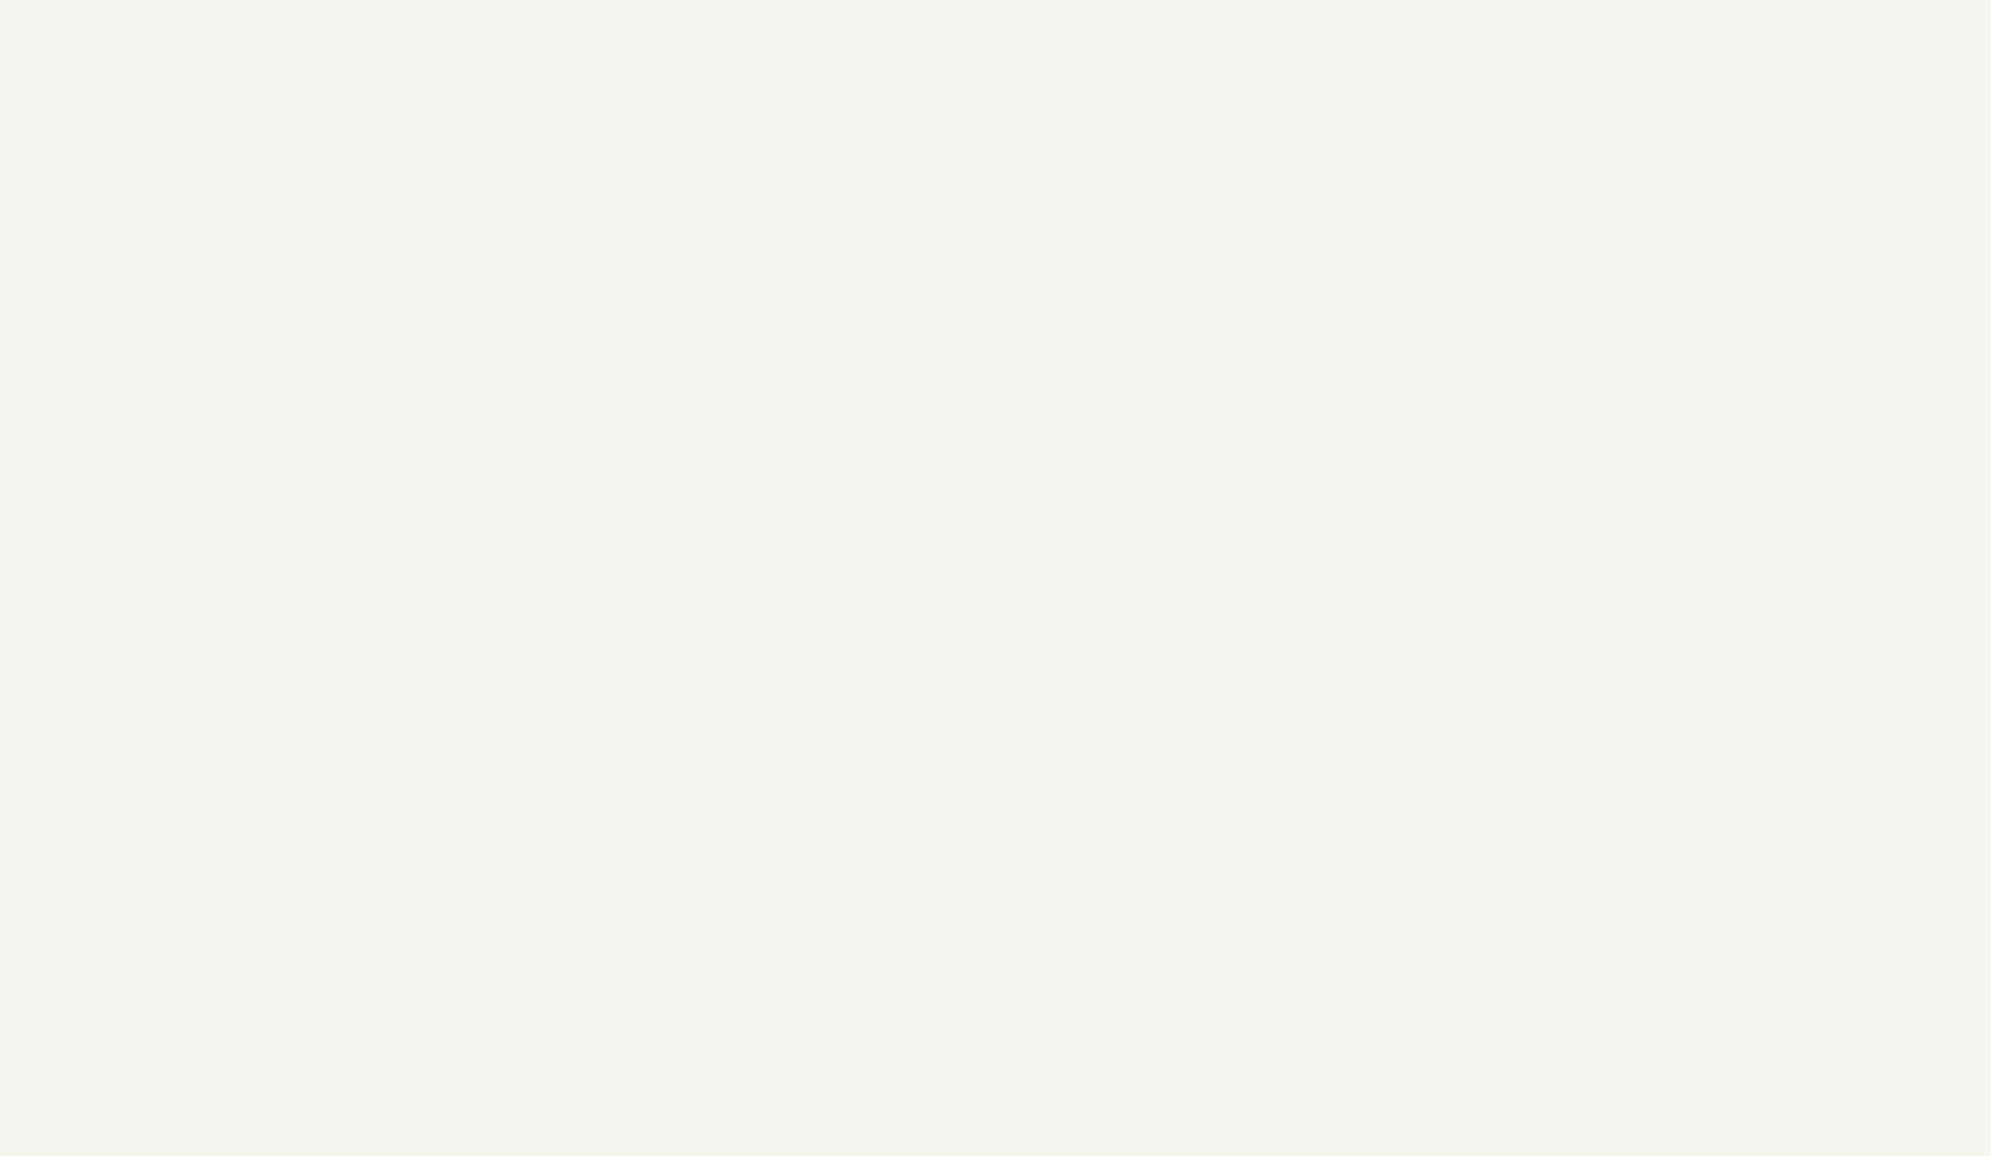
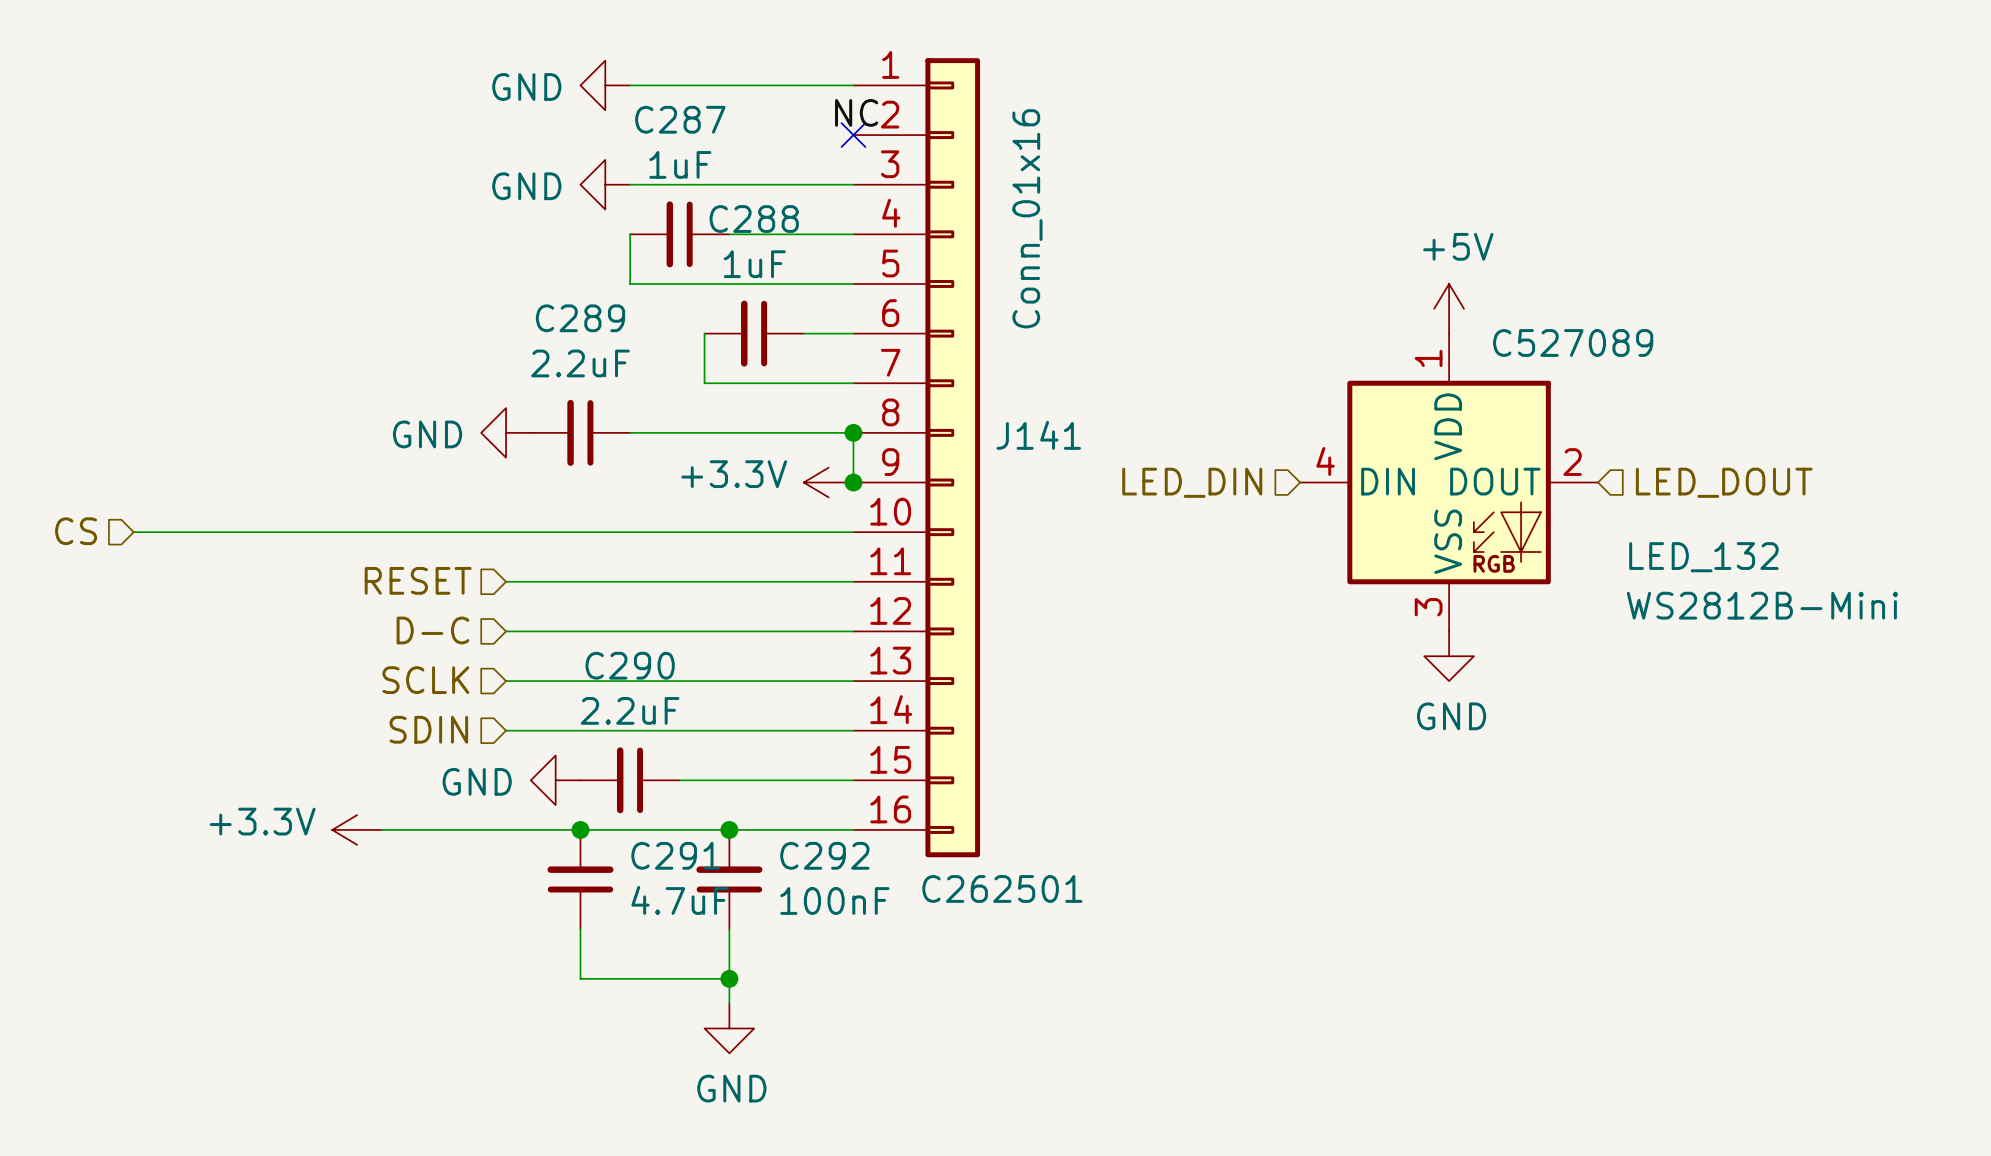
power symbol: none -> GND (605, 85)
wire: none -> (630, 85) (853, 85)
label: none -> NC (856, 112)
no-connect mark: none -> (853, 135)
power symbol: none -> GND (605, 184)
wire: none -> (630, 184) (853, 184)
wire: none -> (630, 234) (630, 283) (853, 283)
C287: none -> 1uF (679, 234)
wire: none -> (729, 234) (853, 234)
power symbol: none -> +5V (1449, 308)
wire: none -> (704, 333) (704, 383) (853, 383)
C288: none -> 1uF (754, 333)
wire: none -> (803, 333) (853, 333)
power symbol: none -> GND (506, 432)
C289: none -> 2.2uF (580, 432)
wire: none -> (630, 432) (853, 432) (853, 482)
junction: none -> (853, 432)
J141: none -> Conn_01x16 (916, 457)
power symbol: none -> +3.3V (828, 482)
junction: none -> (853, 482)
hierarchical label: none -> LED_DIN (1192, 482)
LED_132: none -> WS2812B-Mini (1449, 482)
hierarchical label: none -> LED_DOUT (1724, 482)
hierarchical label: none -> CS (76, 531)
wire: none -> (133, 532) (853, 532)
hierarchical label: none -> RESET (418, 580)
wire: none -> (506, 581) (853, 581)
hierarchical label: none -> D-C (432, 630)
wire: none -> (506, 631) (853, 631)
power symbol: none -> GND (1449, 656)
hierarchical label: none -> SCLK (425, 680)
wire: none -> (506, 681) (853, 681)
hierarchical label: none -> SDIN (428, 729)
wire: none -> (506, 730) (853, 730)
power symbol: none -> GND (555, 780)
C290: none -> 2.2uF (630, 780)
wire: none -> (679, 780) (853, 780)
power symbol: none -> +3.3V (357, 829)
wire: none -> (381, 829) (853, 829)
junction: none -> (580, 829)
junction: none -> (729, 829)
C291: none -> 4.7uF (580, 879)
C292: none -> 100nF (729, 879)
wire: none -> (580, 929) (580, 978) (729, 978)
wire: none -> (729, 929) (729, 1003)
junction: none -> (729, 978)
power symbol: none -> GND (729, 1028)

